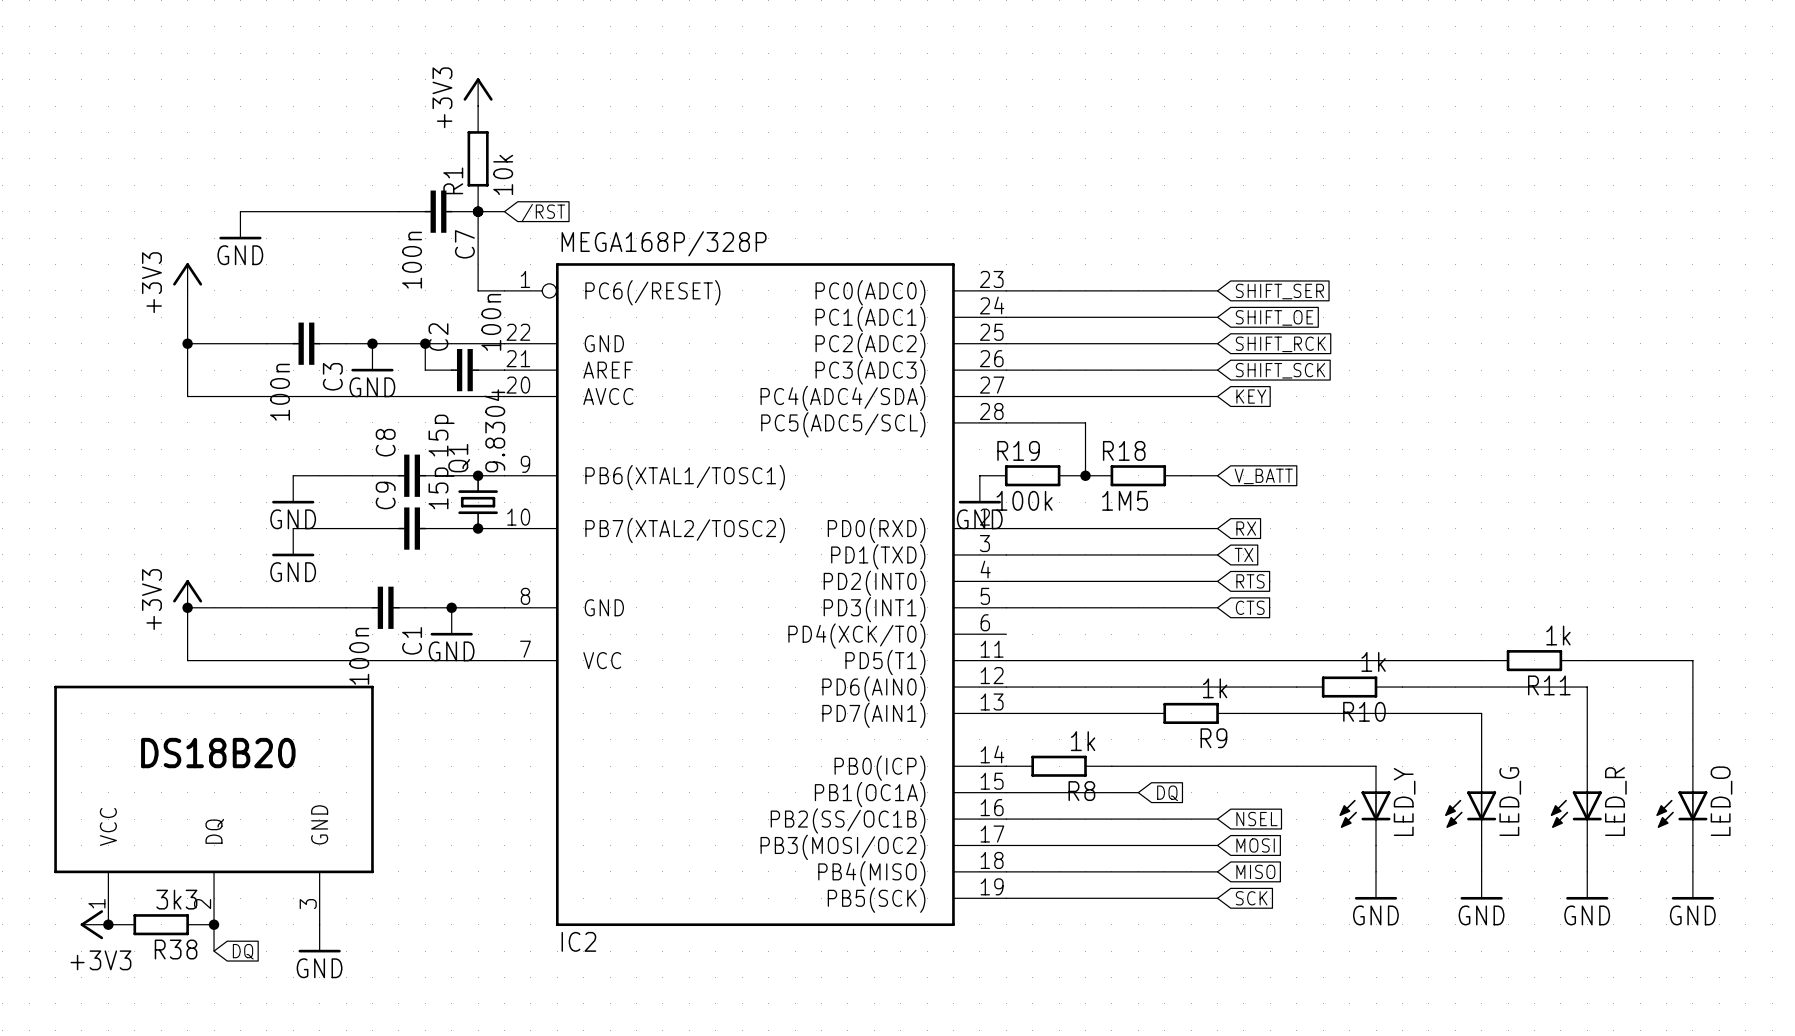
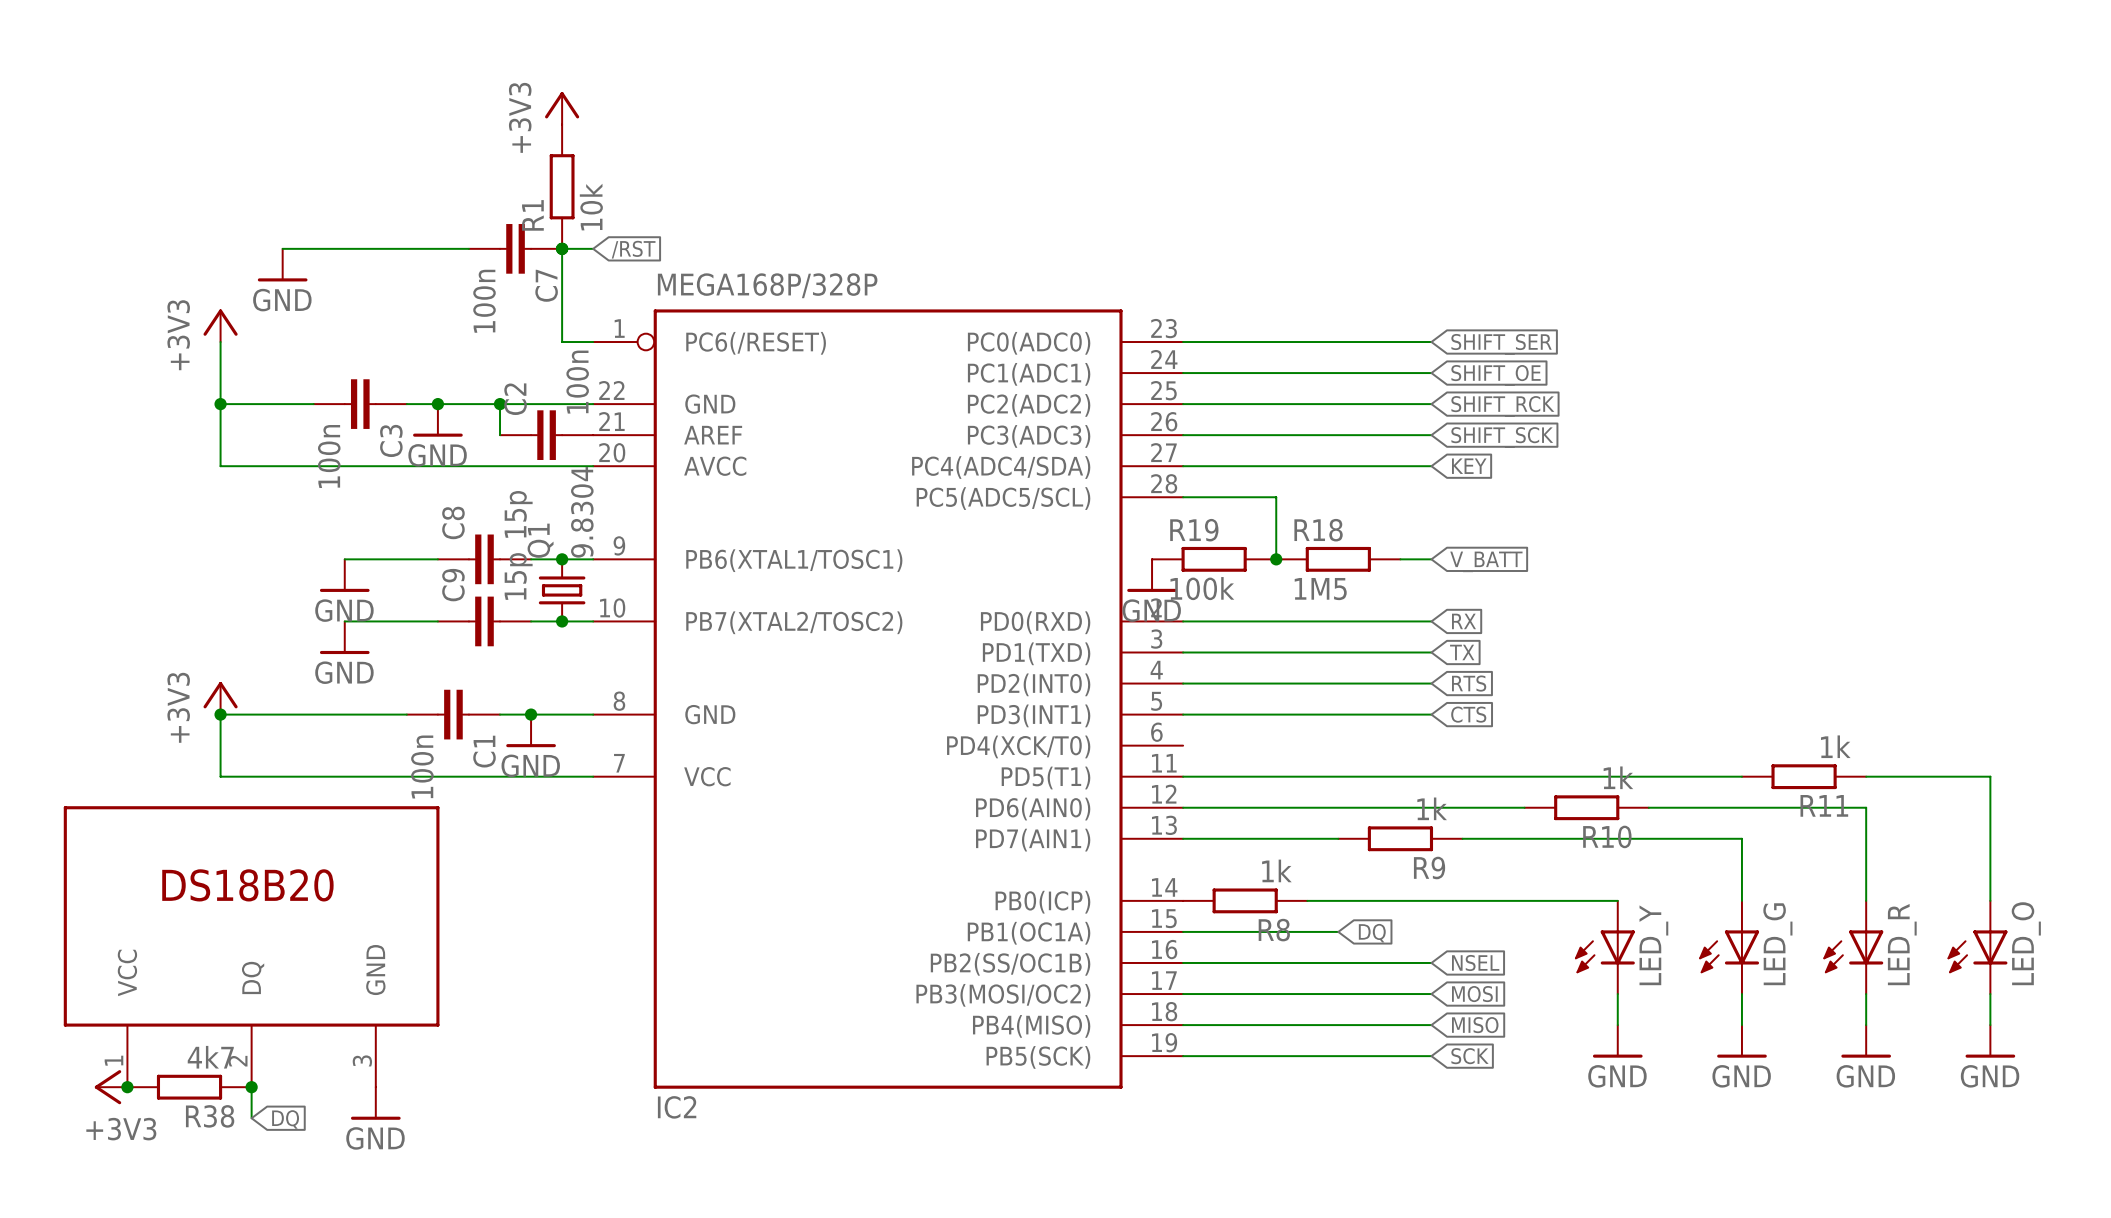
R38 value: 3k3 (176, 899) -> 4k7 (210, 1057)

